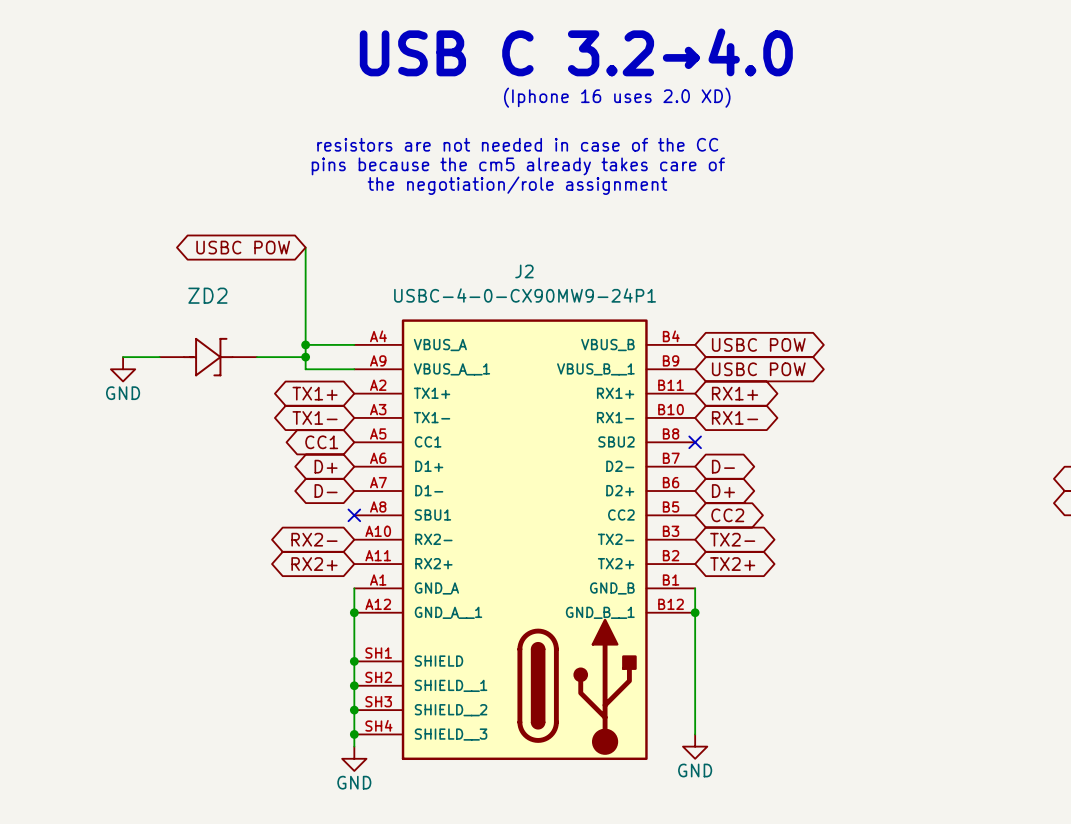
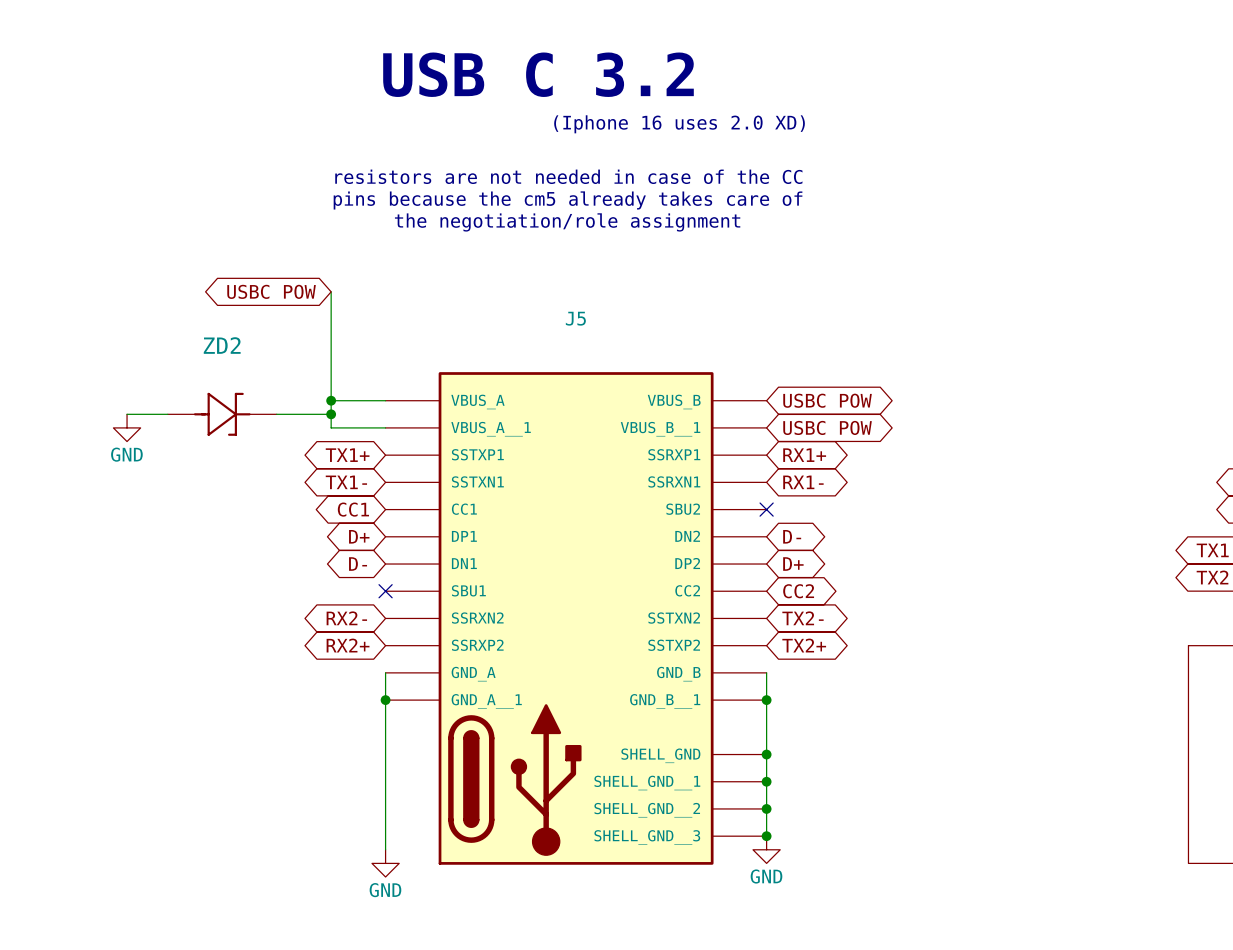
text: USB C 3.2→4.0 (576, 52) -> USB C 3.2 (538, 74)
J2: USBC-4-0-CX90MW9-24P1 (524, 539) -> none
J5: none -> (576, 618)
junction: (354, 661) -> none
junction: none -> (766, 754)
junction: (354, 685) -> none
junction: none -> (766, 781)
junction: (354, 710) -> none
junction: none -> (766, 808)
junction: (354, 734) -> none
junction: none -> (766, 836)

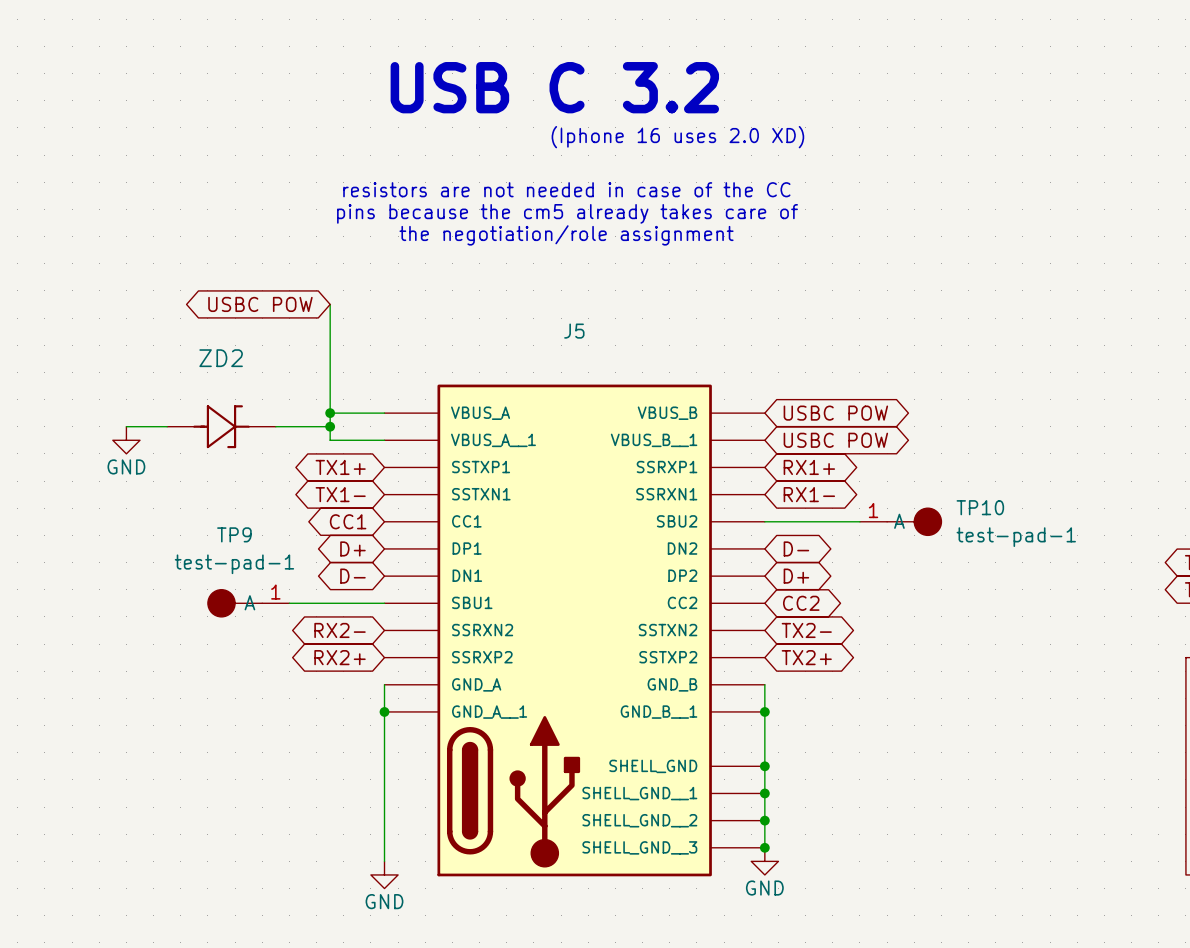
wire: none -> (764, 521) (859, 521)
no-connect mark: (766, 509) -> none
TP10: none -> test-pad-1 (900, 521)
TP9: none -> test-pad-1 (248, 603)
wire: none -> (289, 603) (384, 603)
no-connect mark: (385, 591) -> none

